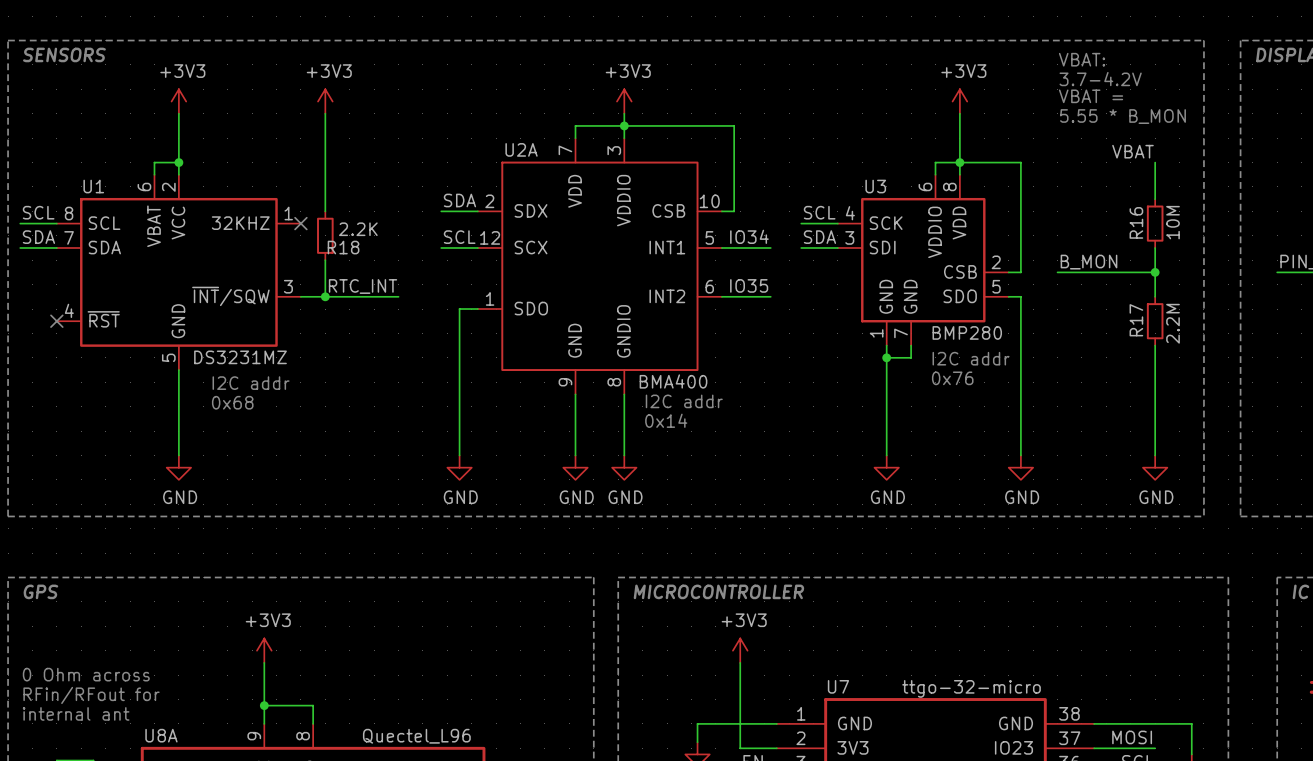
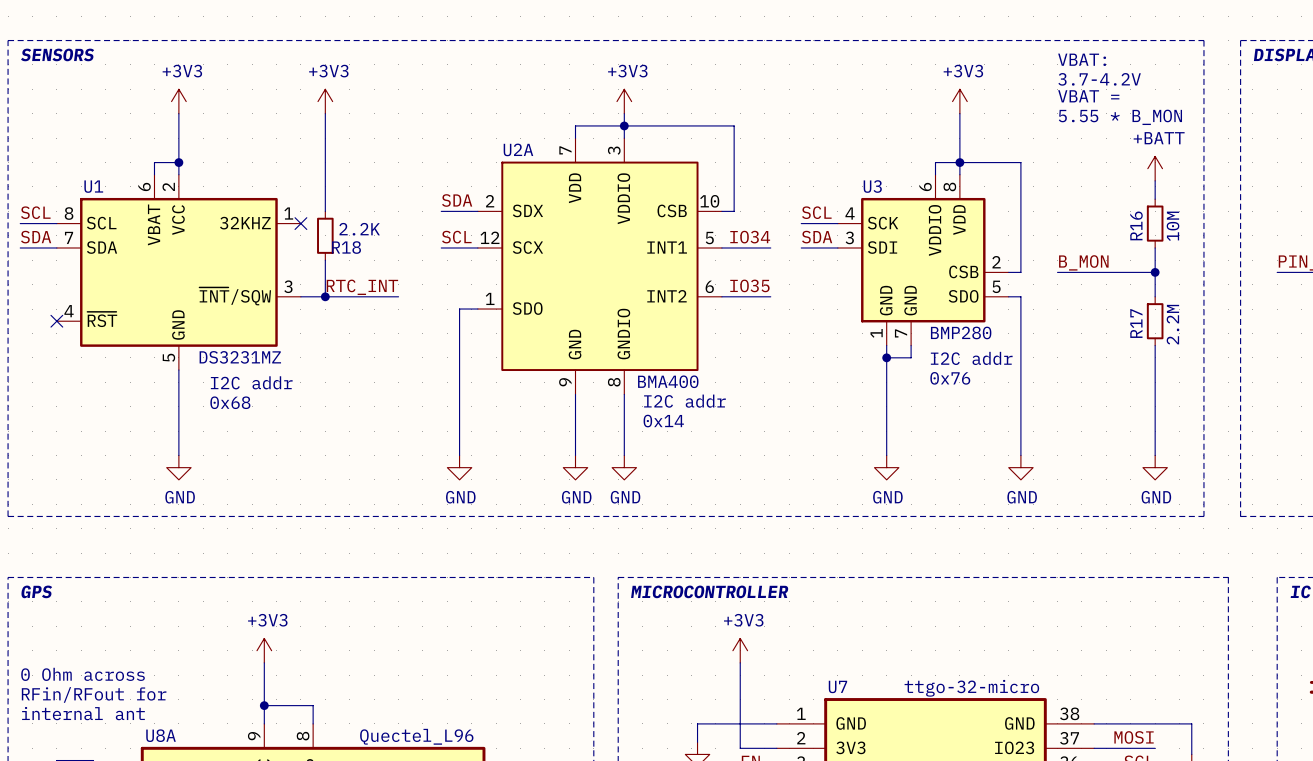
label: VBAT (1132, 151) -> none
power symbol: none -> +BATT (1155, 168)

